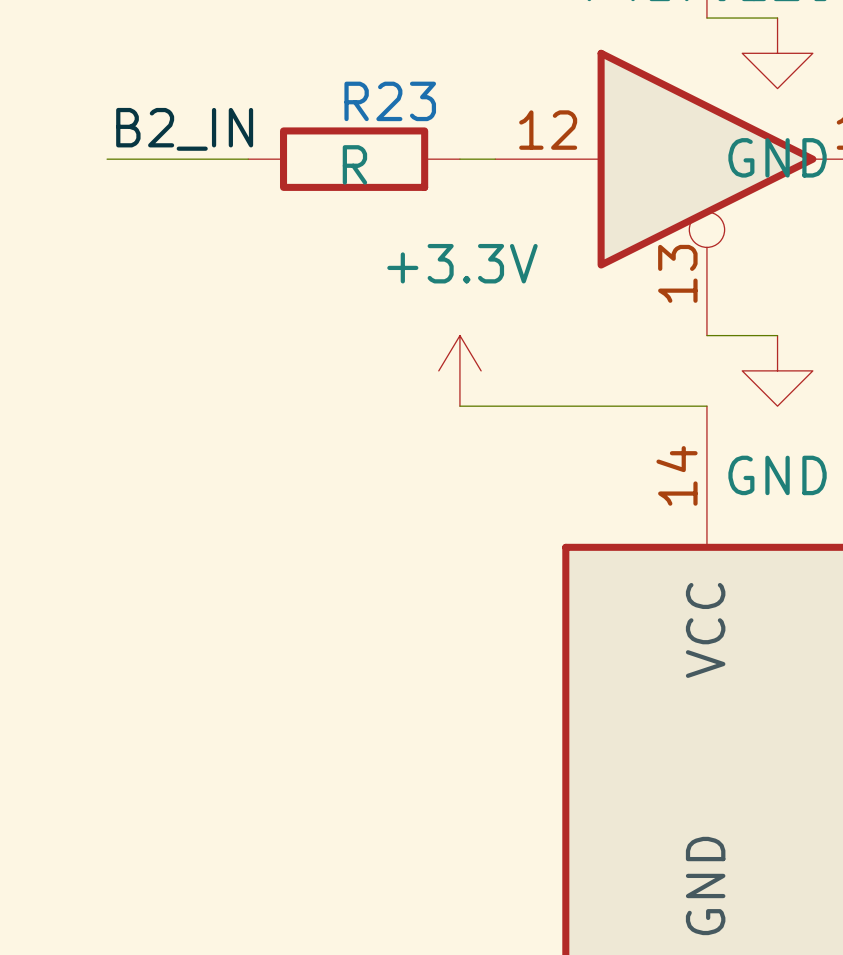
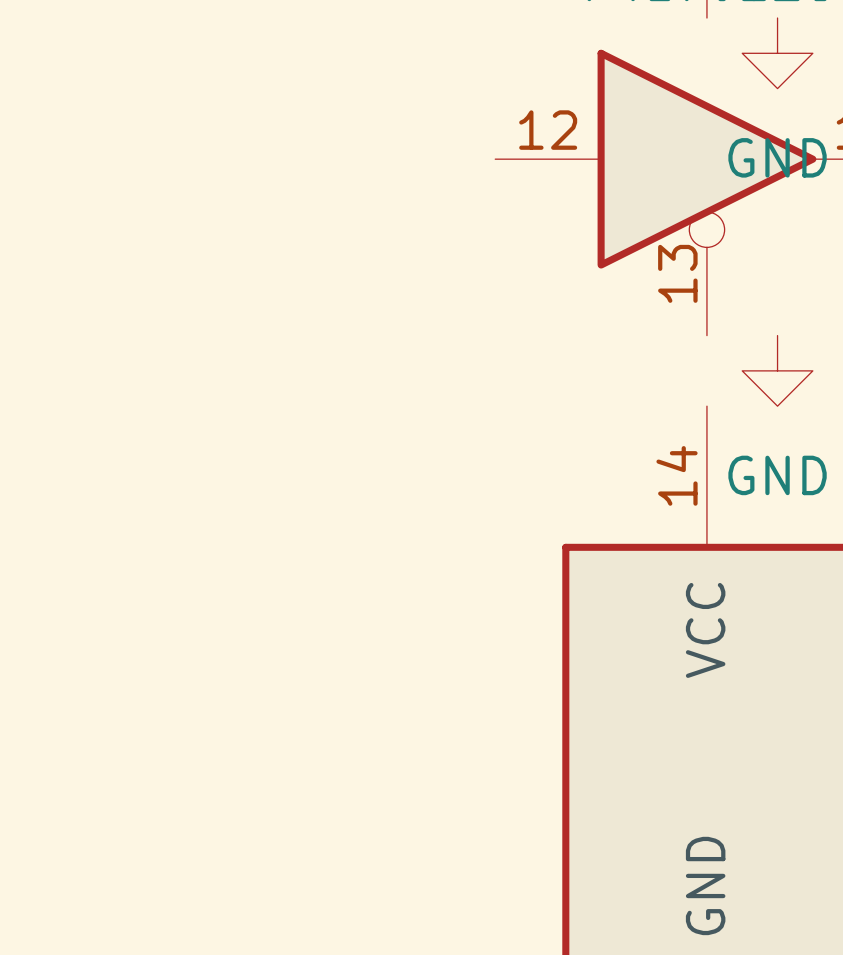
wire: (706, 18) (777, 18) -> none
label: B2_IN (184, 129) -> none
wire: (107, 159) (248, 159) -> none
R23: R (354, 159) -> none
wire: (459, 159) (495, 159) -> none
wire: (706, 335) (777, 335) -> none
power symbol: +3.3V (459, 370) -> none
wire: (459, 406) (706, 406) -> none

